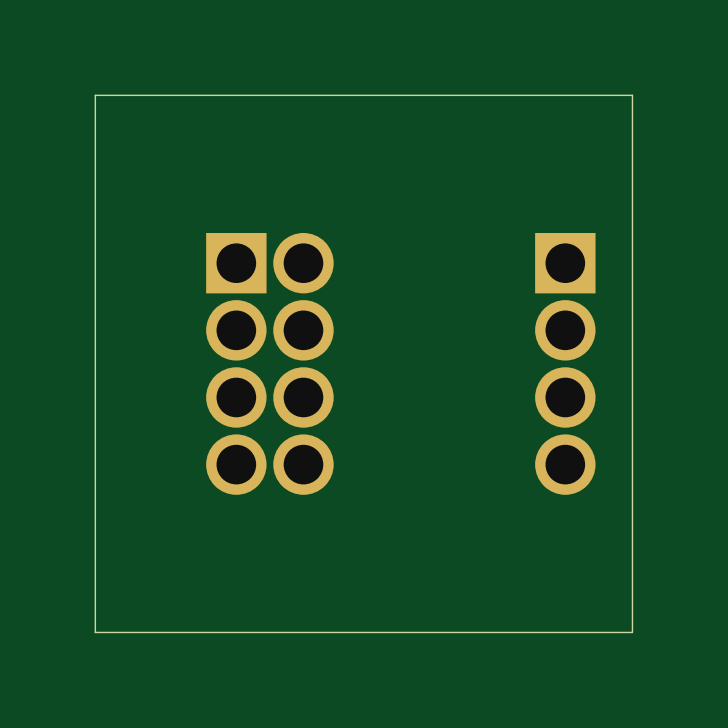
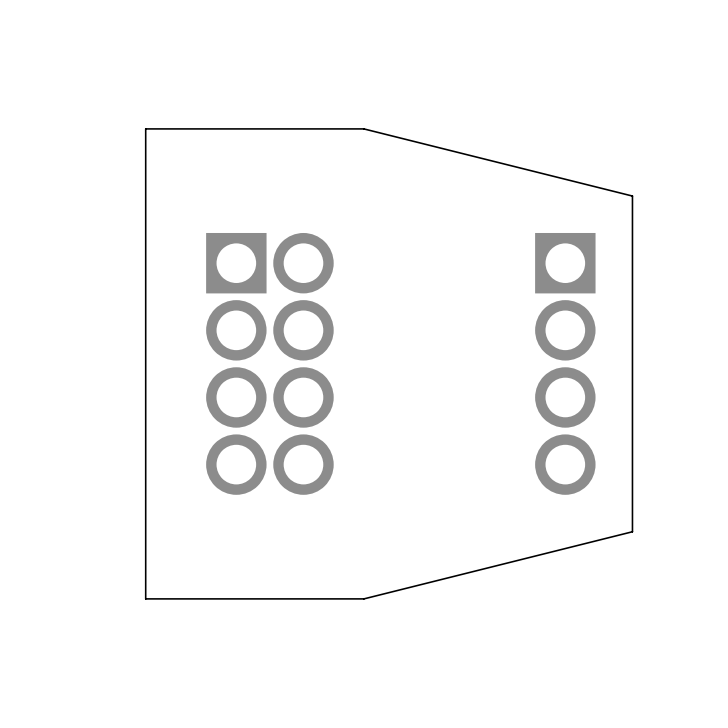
board edge: (632, 196) (632, 95) (95, 95) (95, 632) (632, 632) (632, 531) -> (632, 196) (363, 128) (145, 128) (145, 598) (363, 598) (632, 531)

